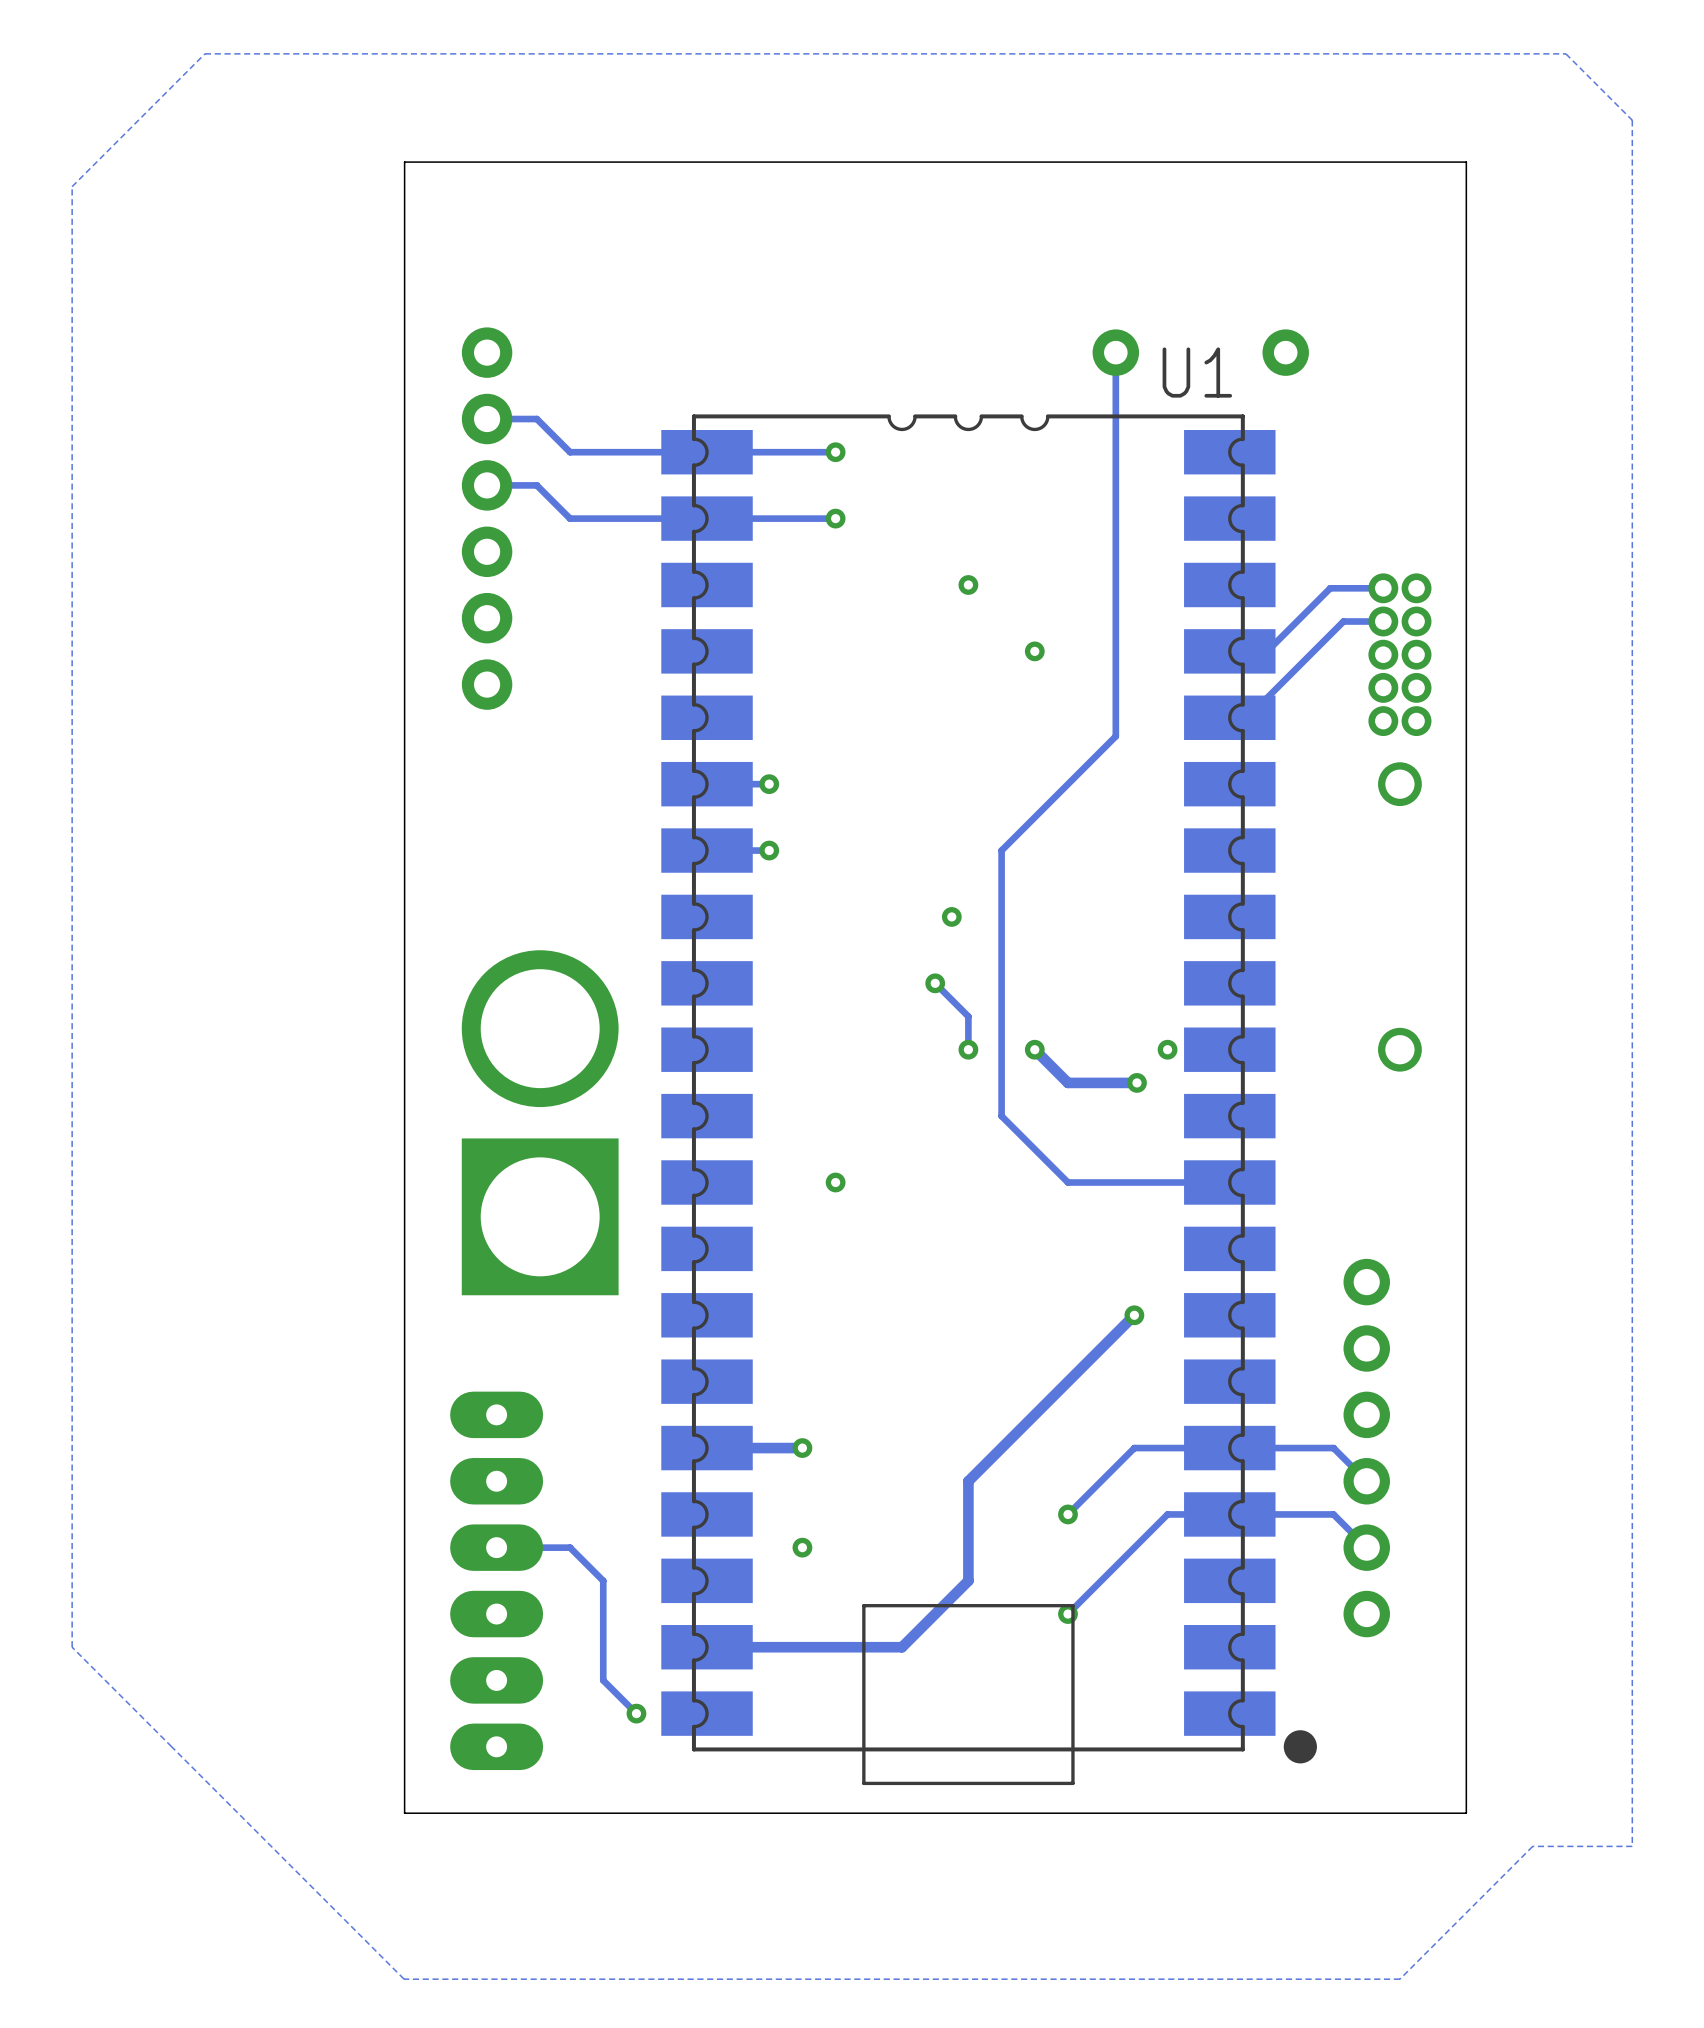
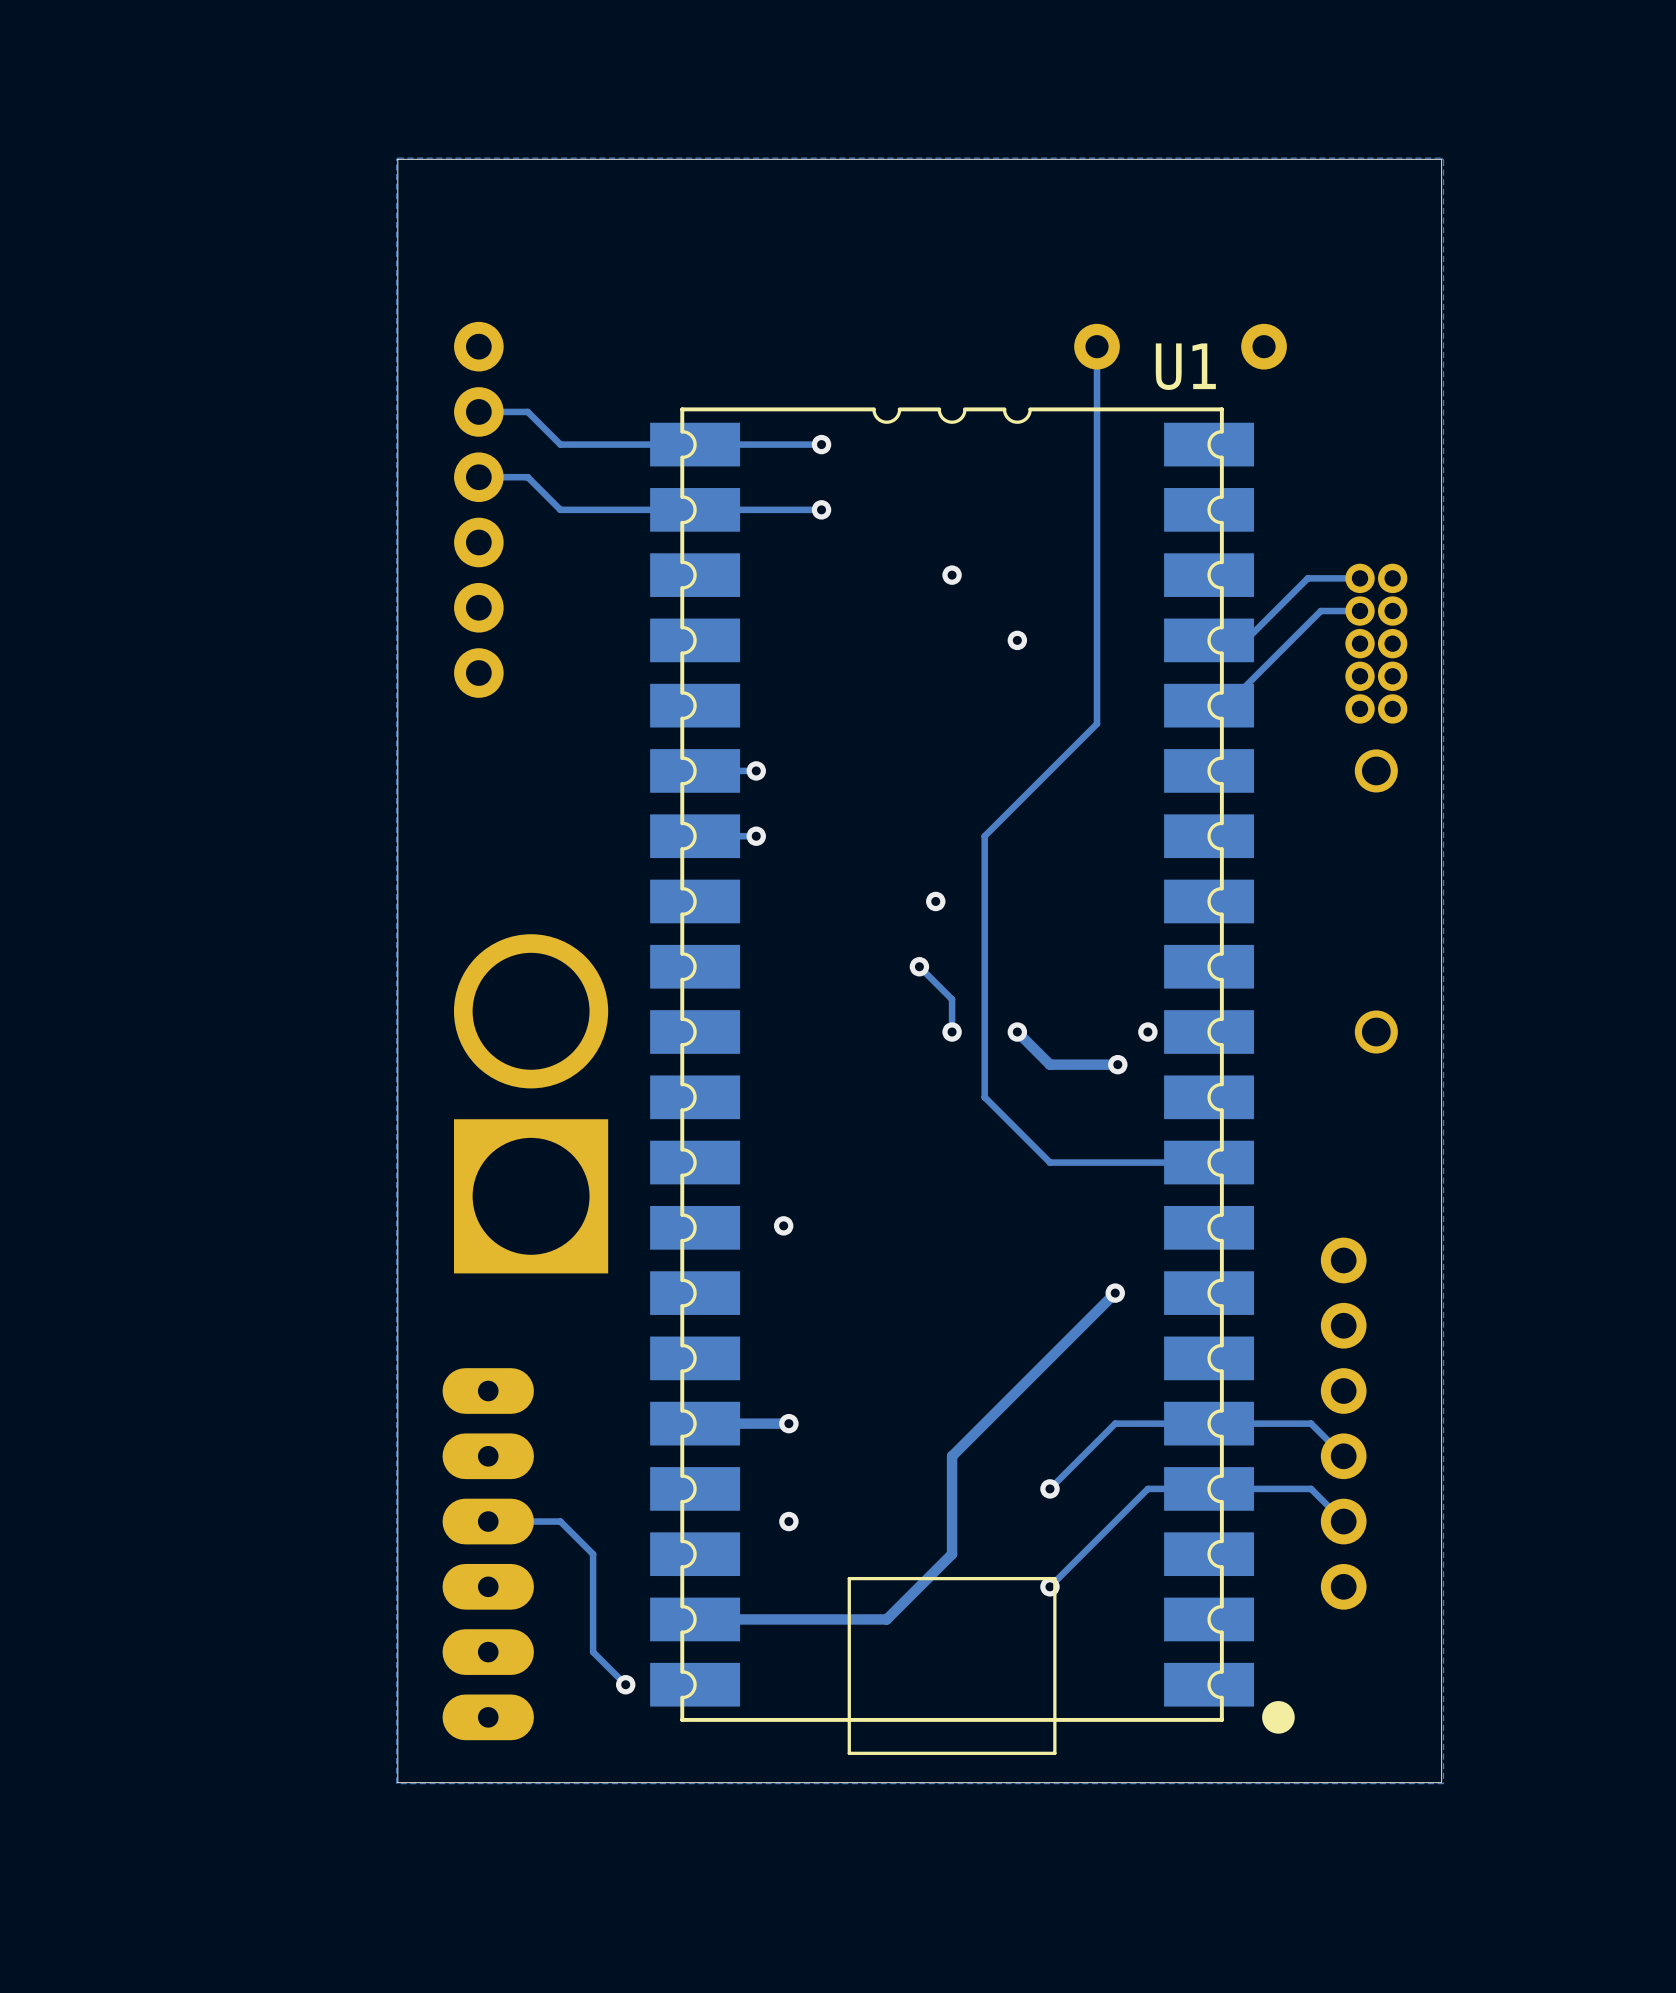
zone outline: (1565, 53) (204, 53) (72, 186) (72, 1647) (404, 1979) (1399, 1979) (1532, 1846) (1632, 1846) (1632, 120) (1565, 53) -> (1441, 158) (1443, 160) (1443, 1783) (397, 1783) (396, 159) (1441, 158)
via position: (835, 1182) -> (783, 1225)

